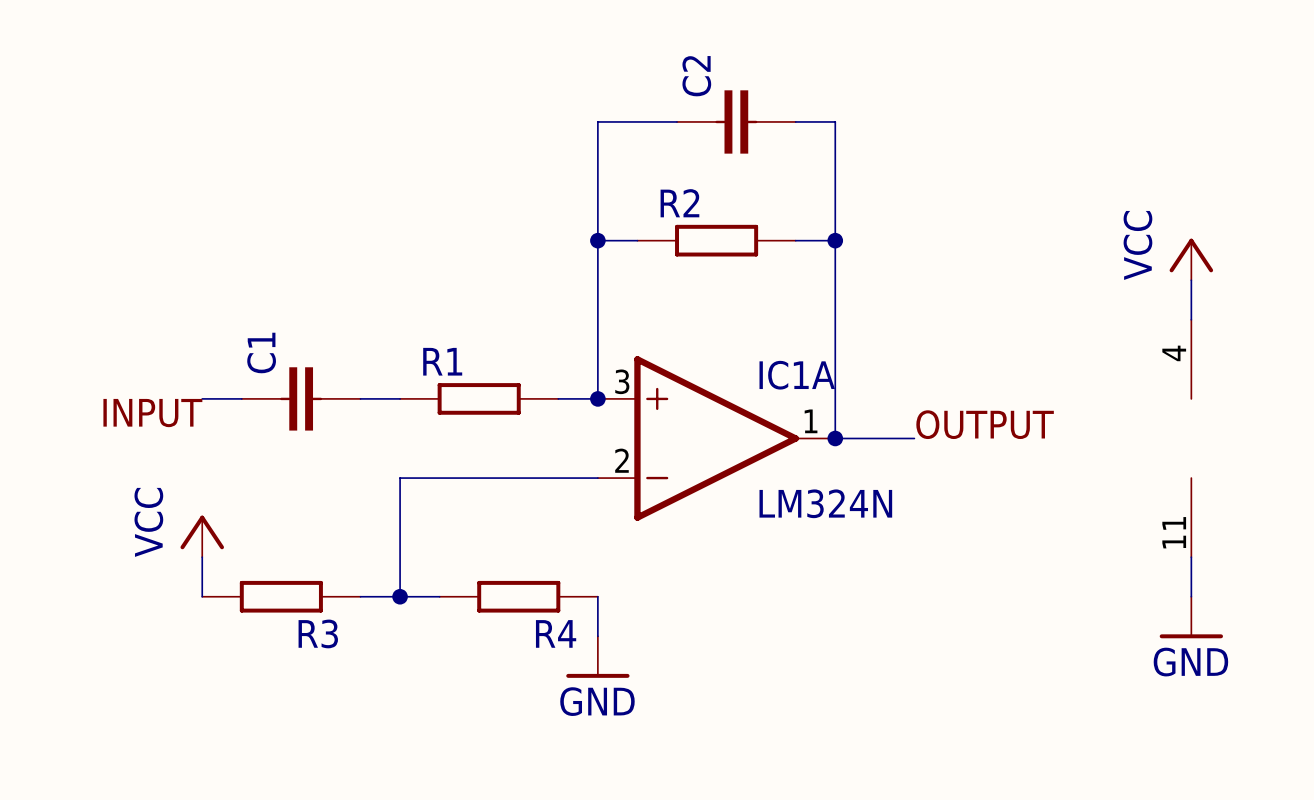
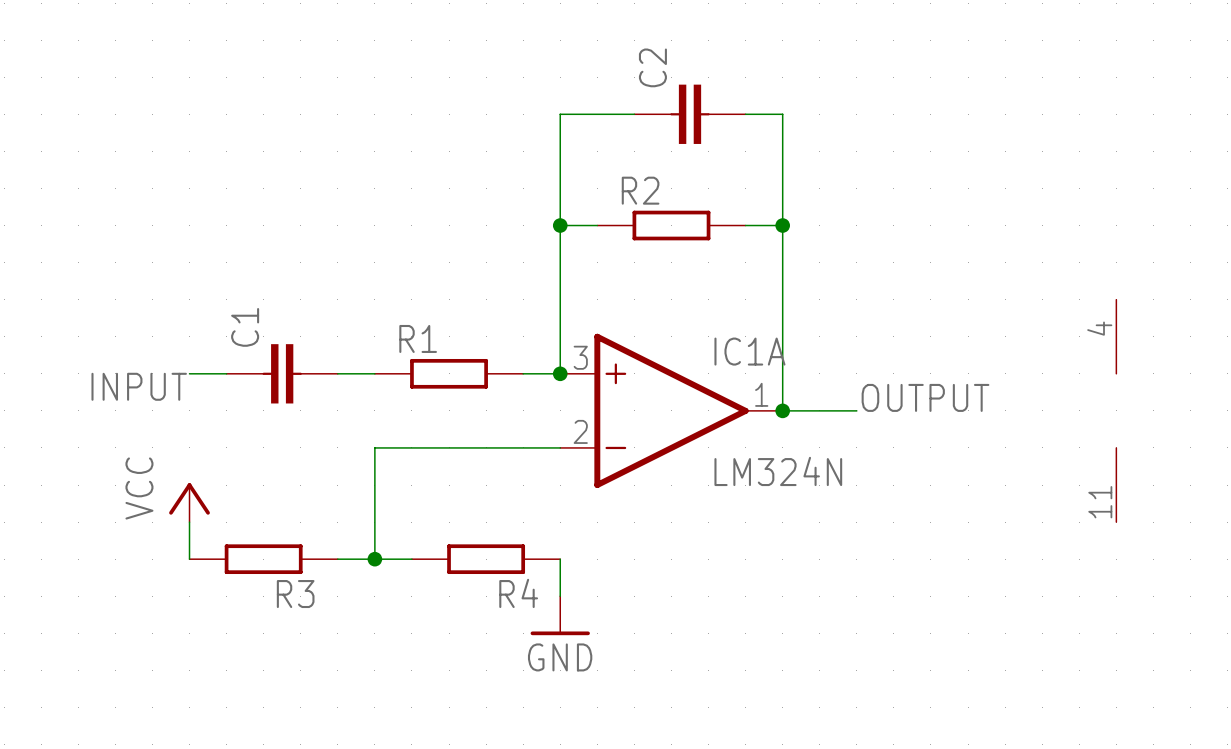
power symbol: VCC (1191, 259) -> none
wire: (1191, 280) (1191, 319) -> none
wire: (1191, 557) (1191, 596) -> none
power symbol: GND (1191, 617) -> none

